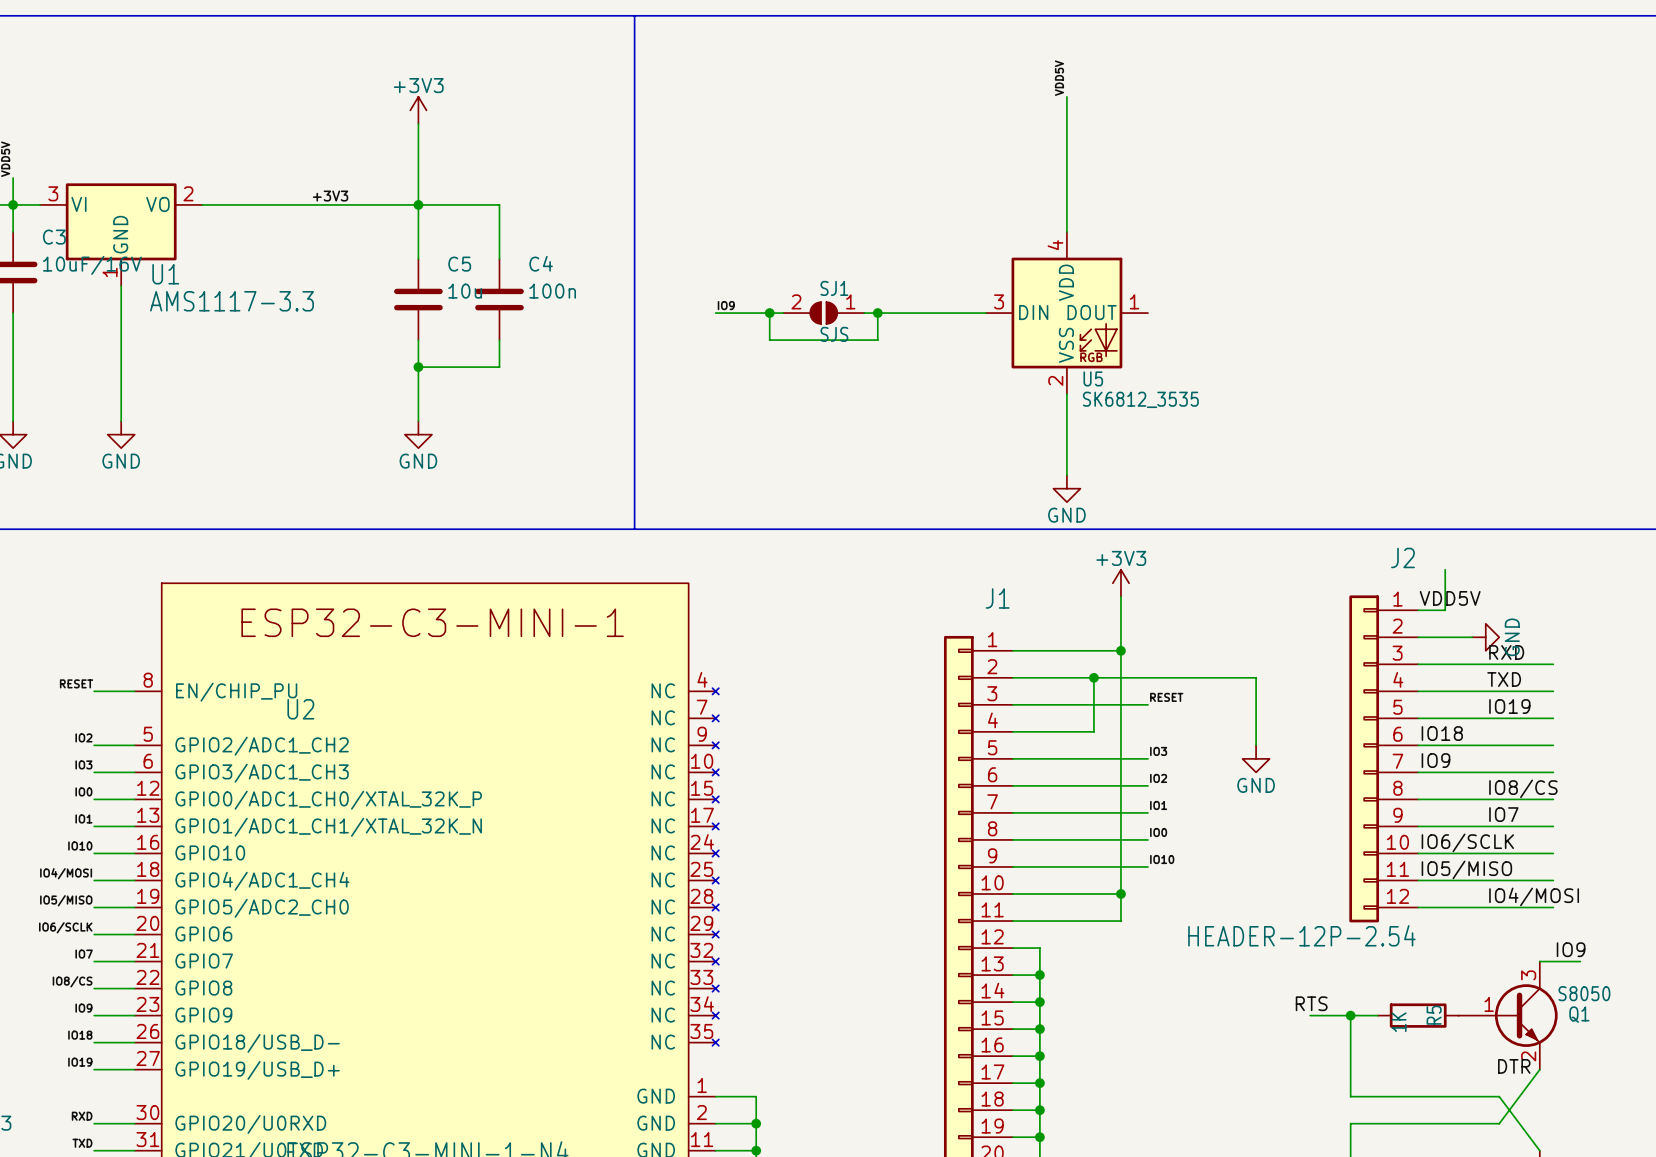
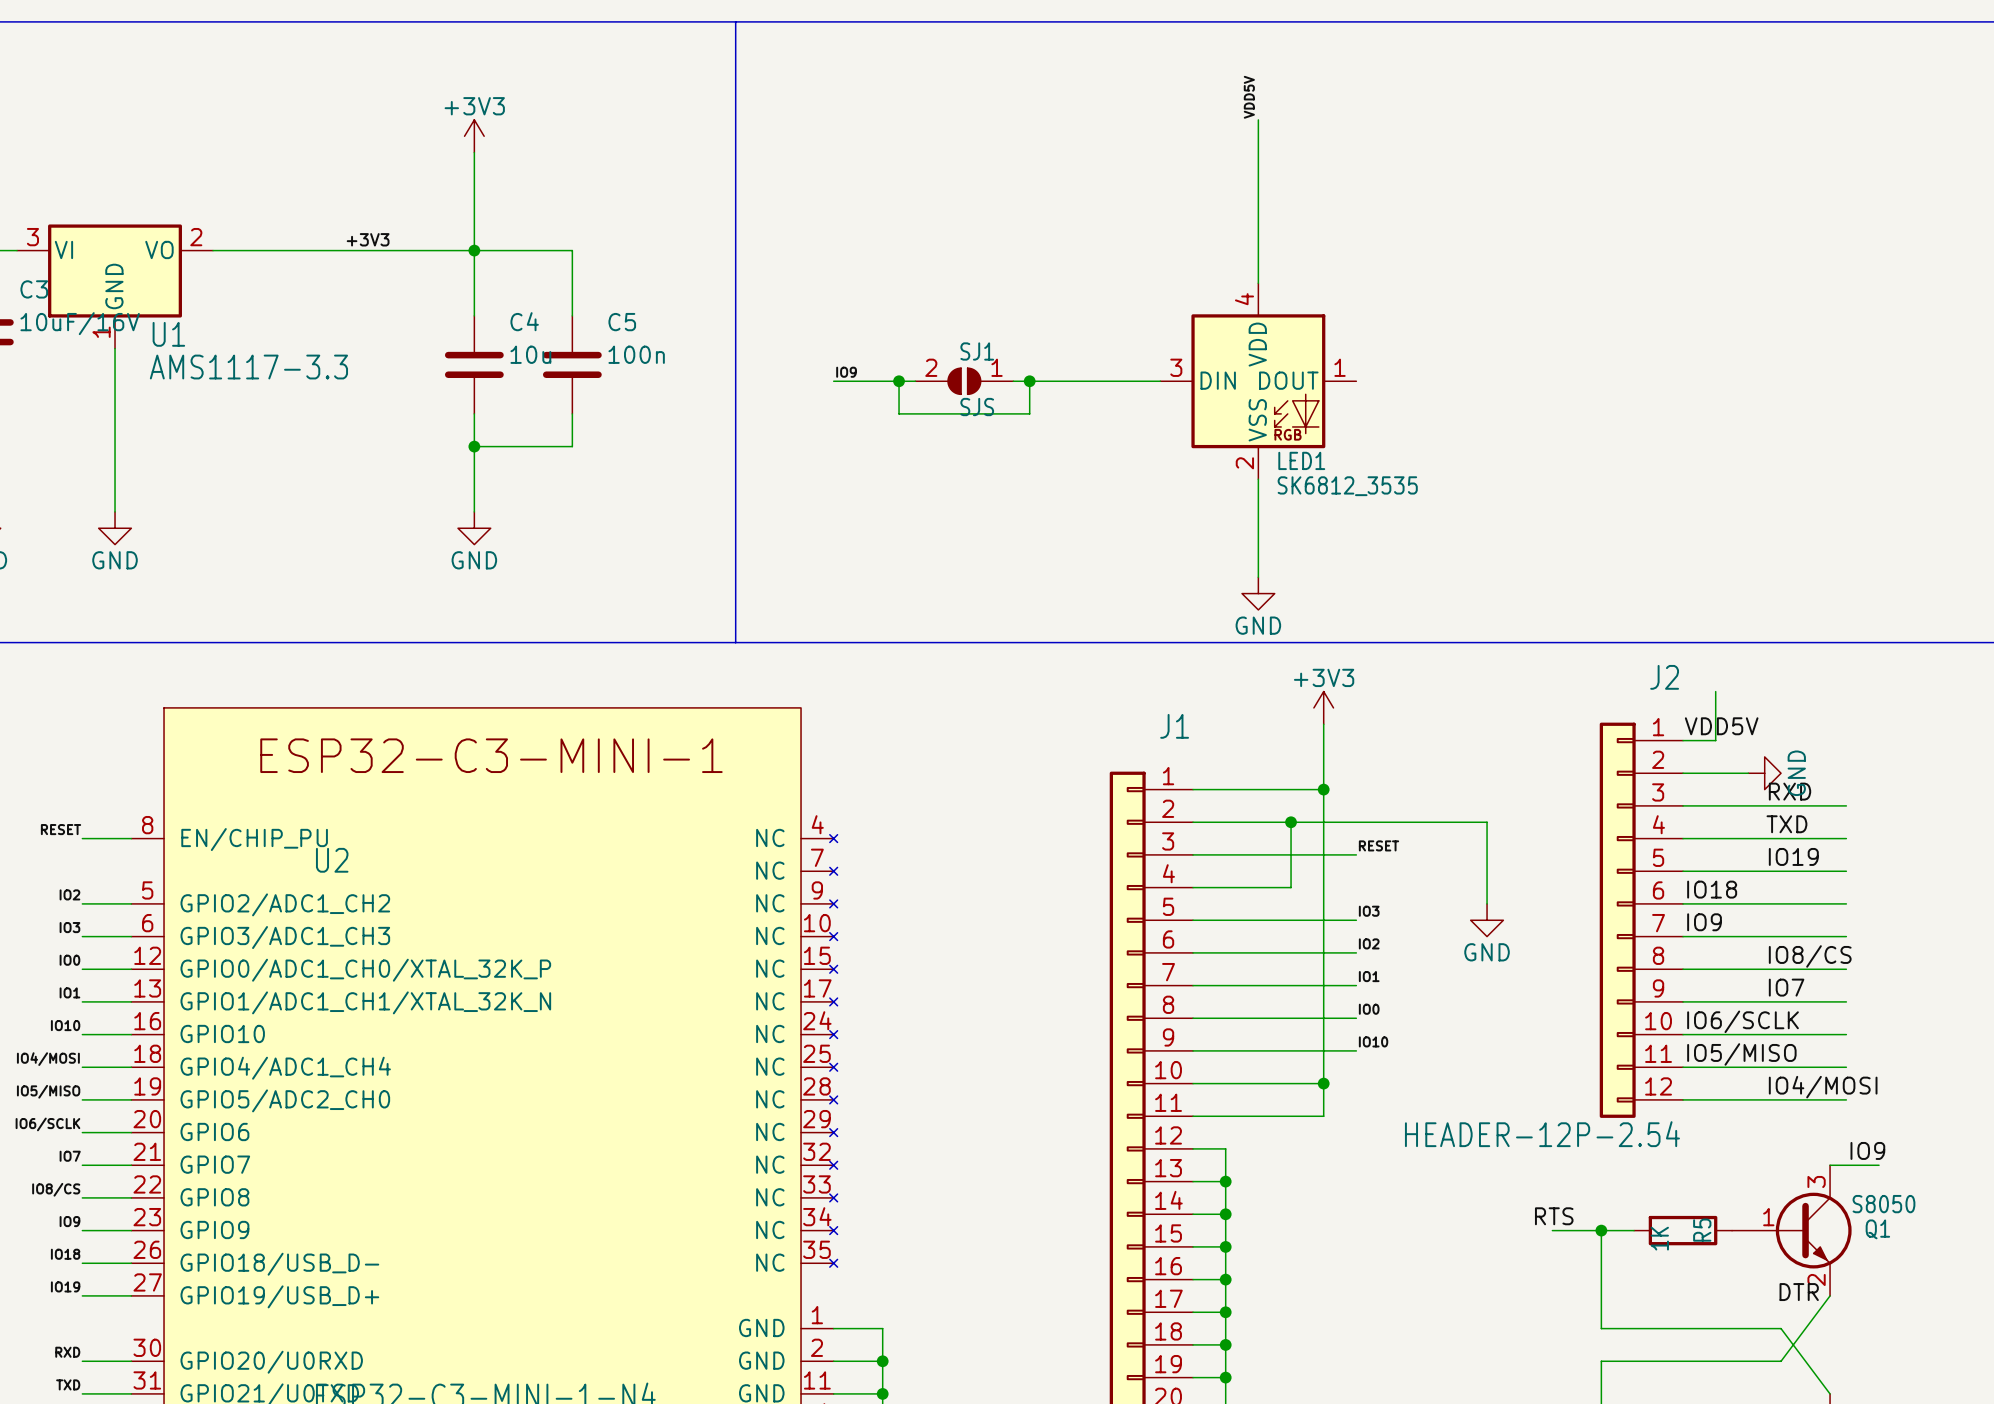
C4 name: C4 (541, 263) -> C5 (622, 322)
C5 name: C5 (459, 264) -> C4 (524, 321)
U5 name: U5 (1093, 378) -> LED1 (1301, 460)

